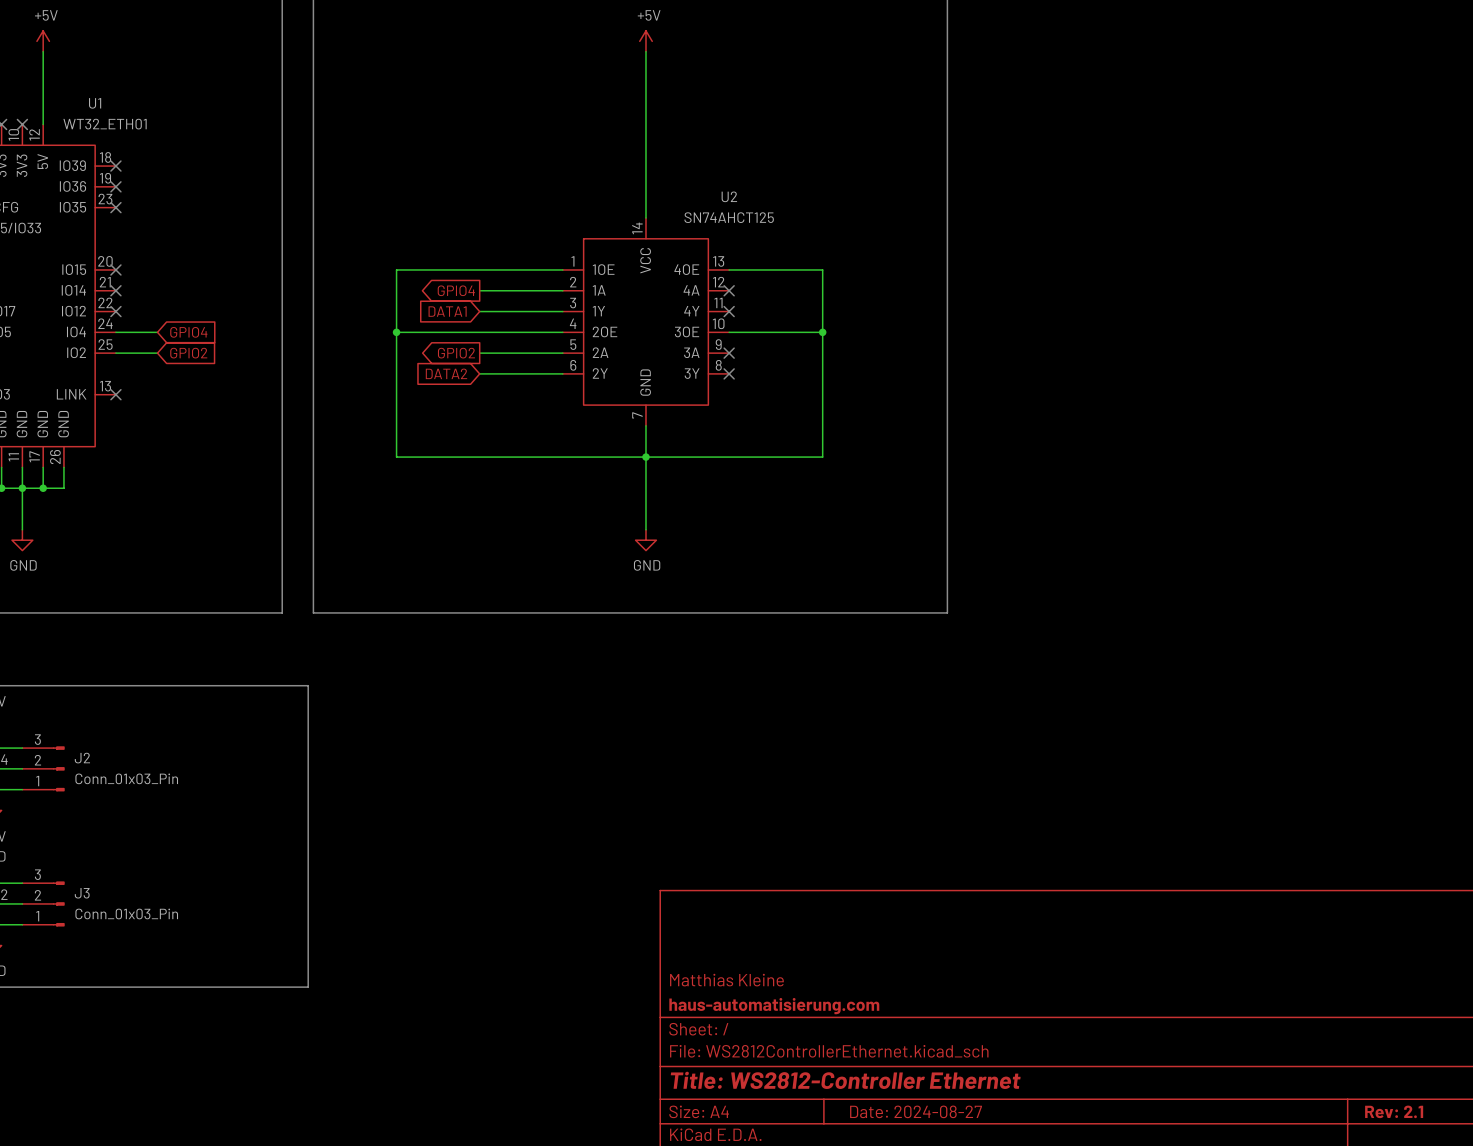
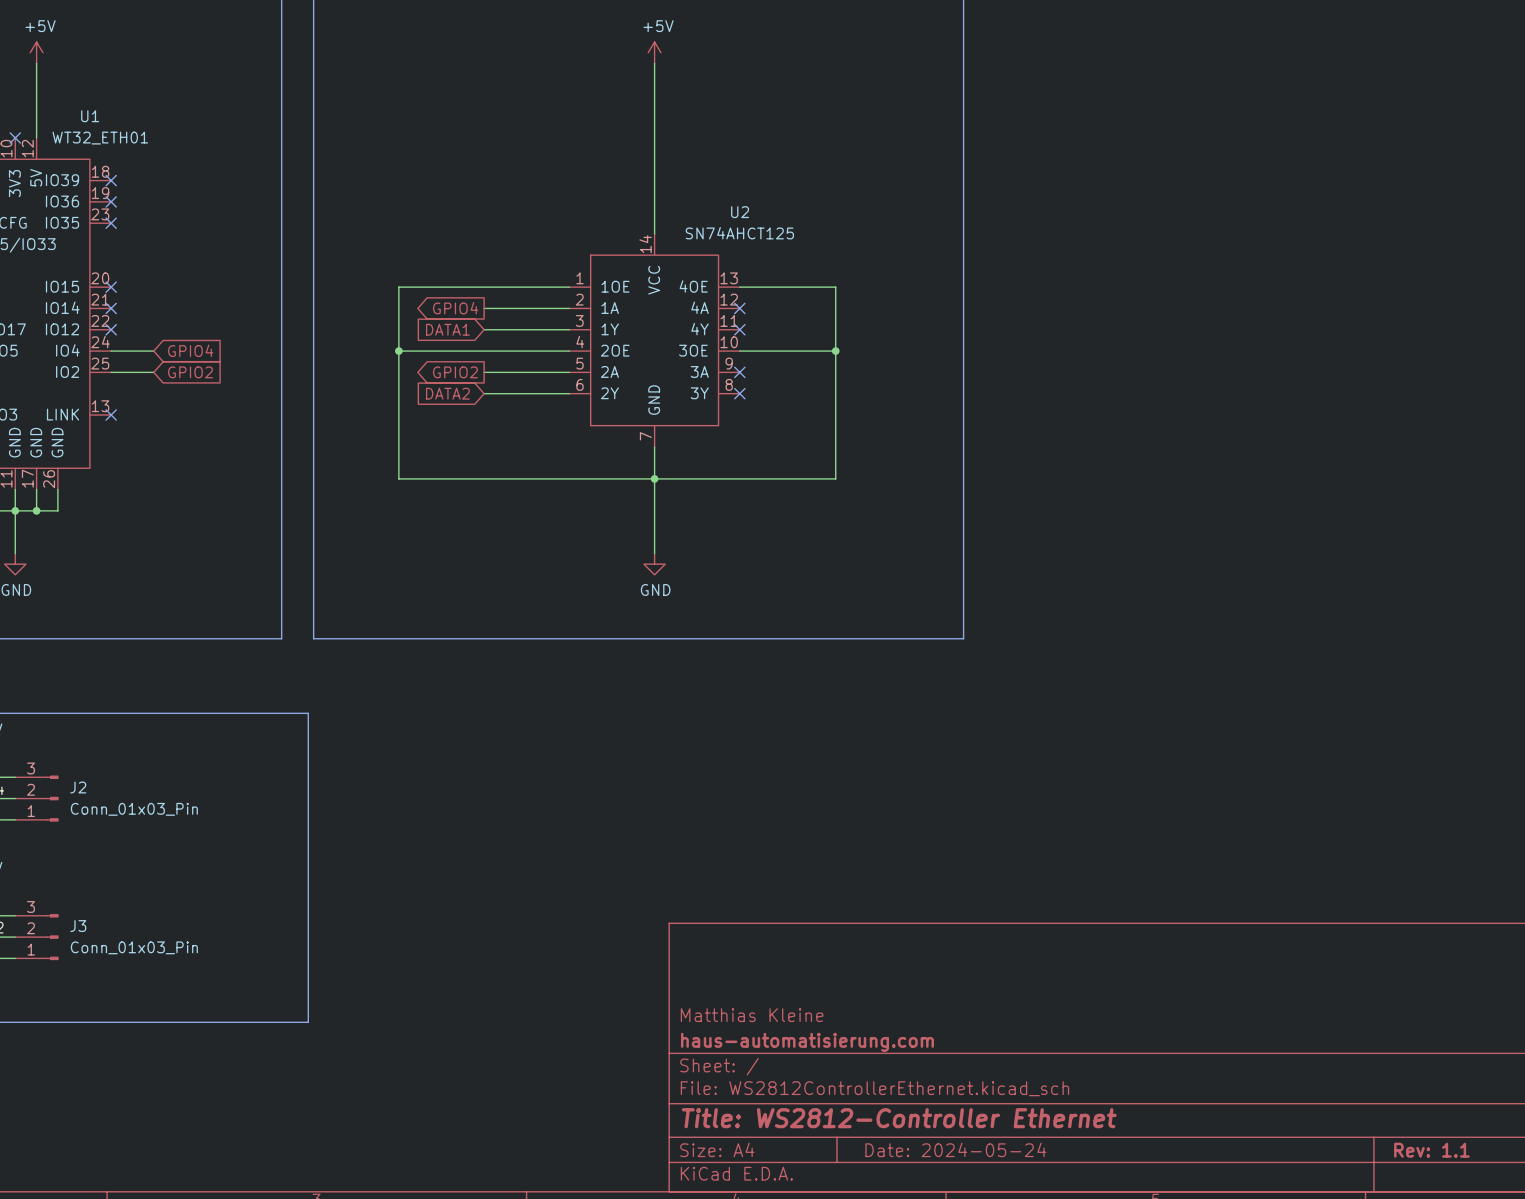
title block: Date: 2024-08-27 (916, 1111) -> Date: 2024-05-24 (955, 1149)
title block: Rev: 2.1 (1394, 1111) -> Rev: 1.1 (1431, 1150)

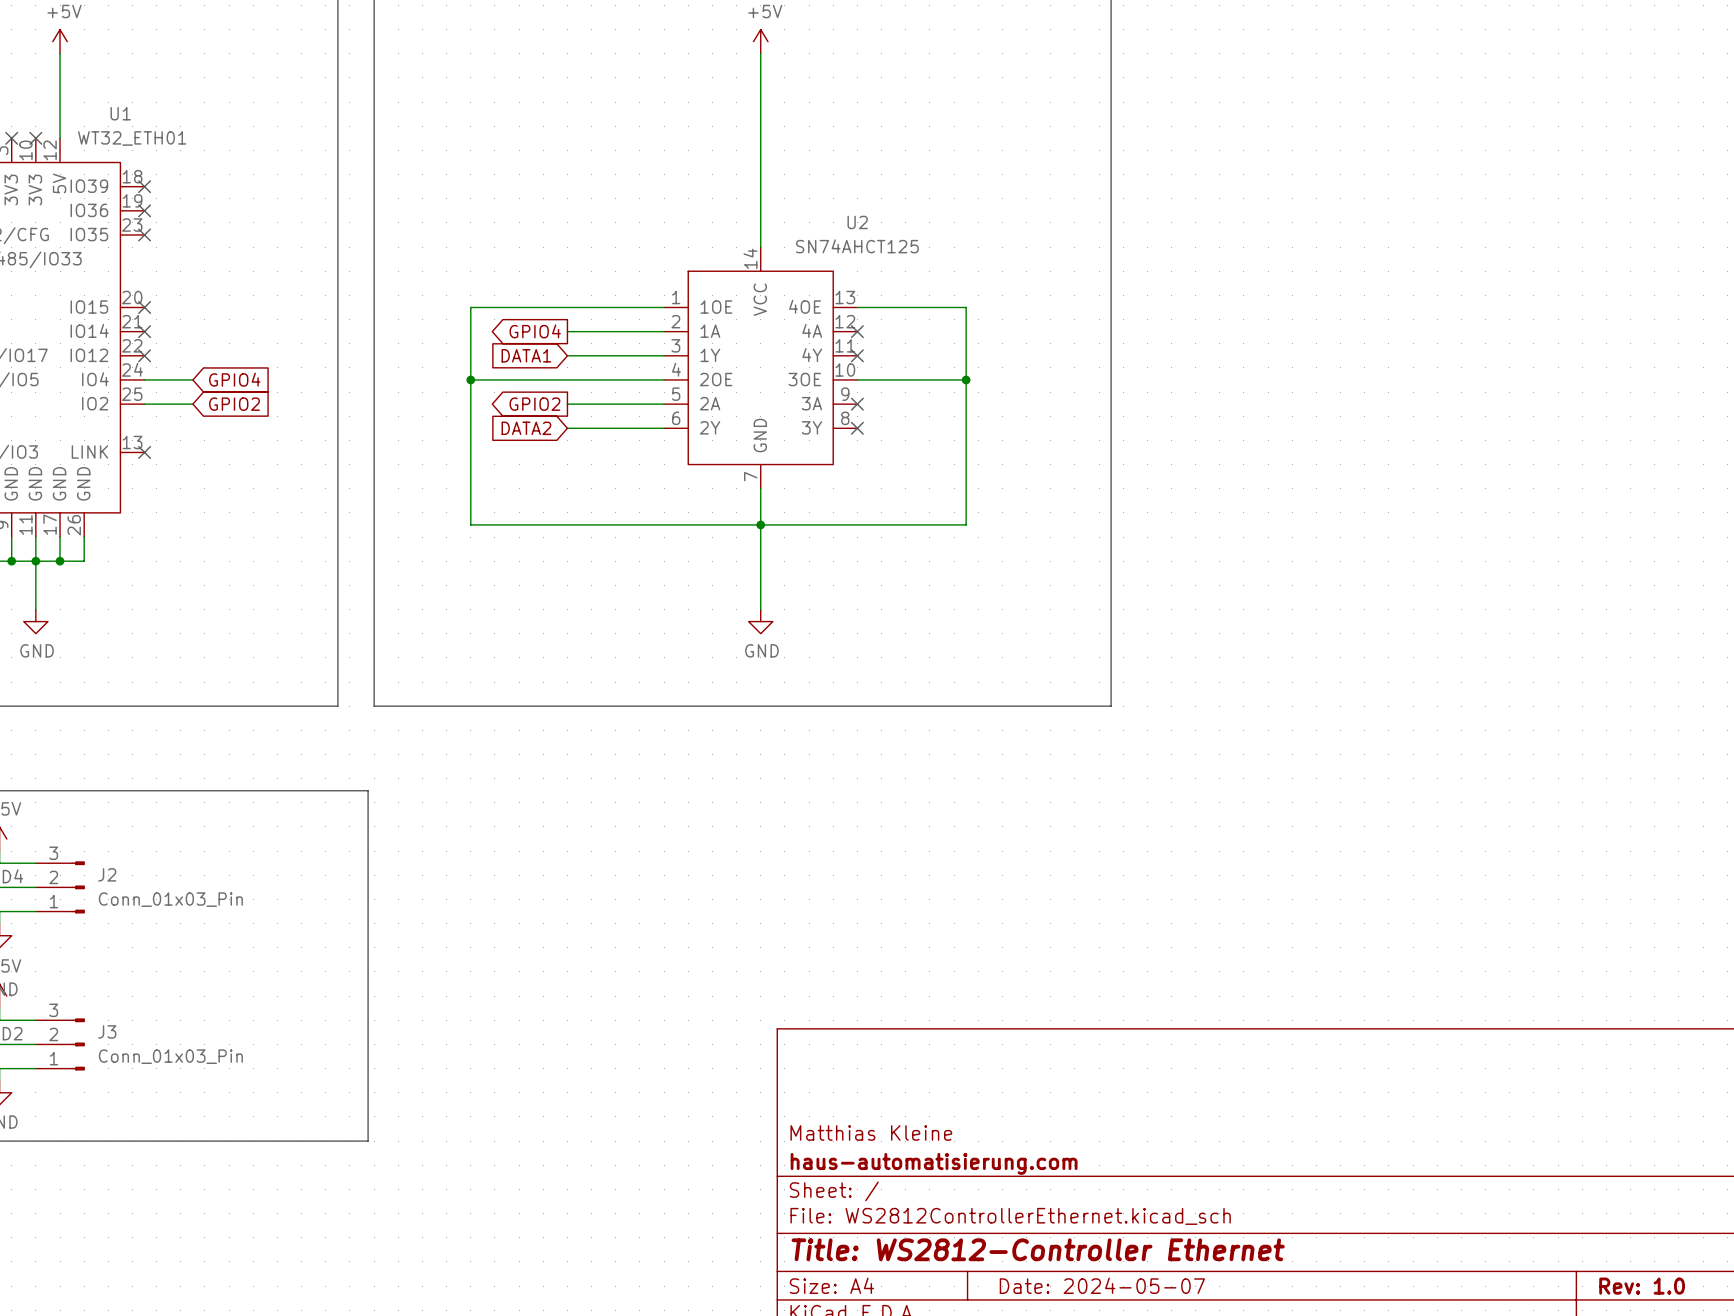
title block: Date: 2024-05-24 (955, 1149) -> Date: 2024-05-07 (1102, 1285)
title block: Rev: 1.1 (1431, 1150) -> Rev: 1.0 (1642, 1286)

